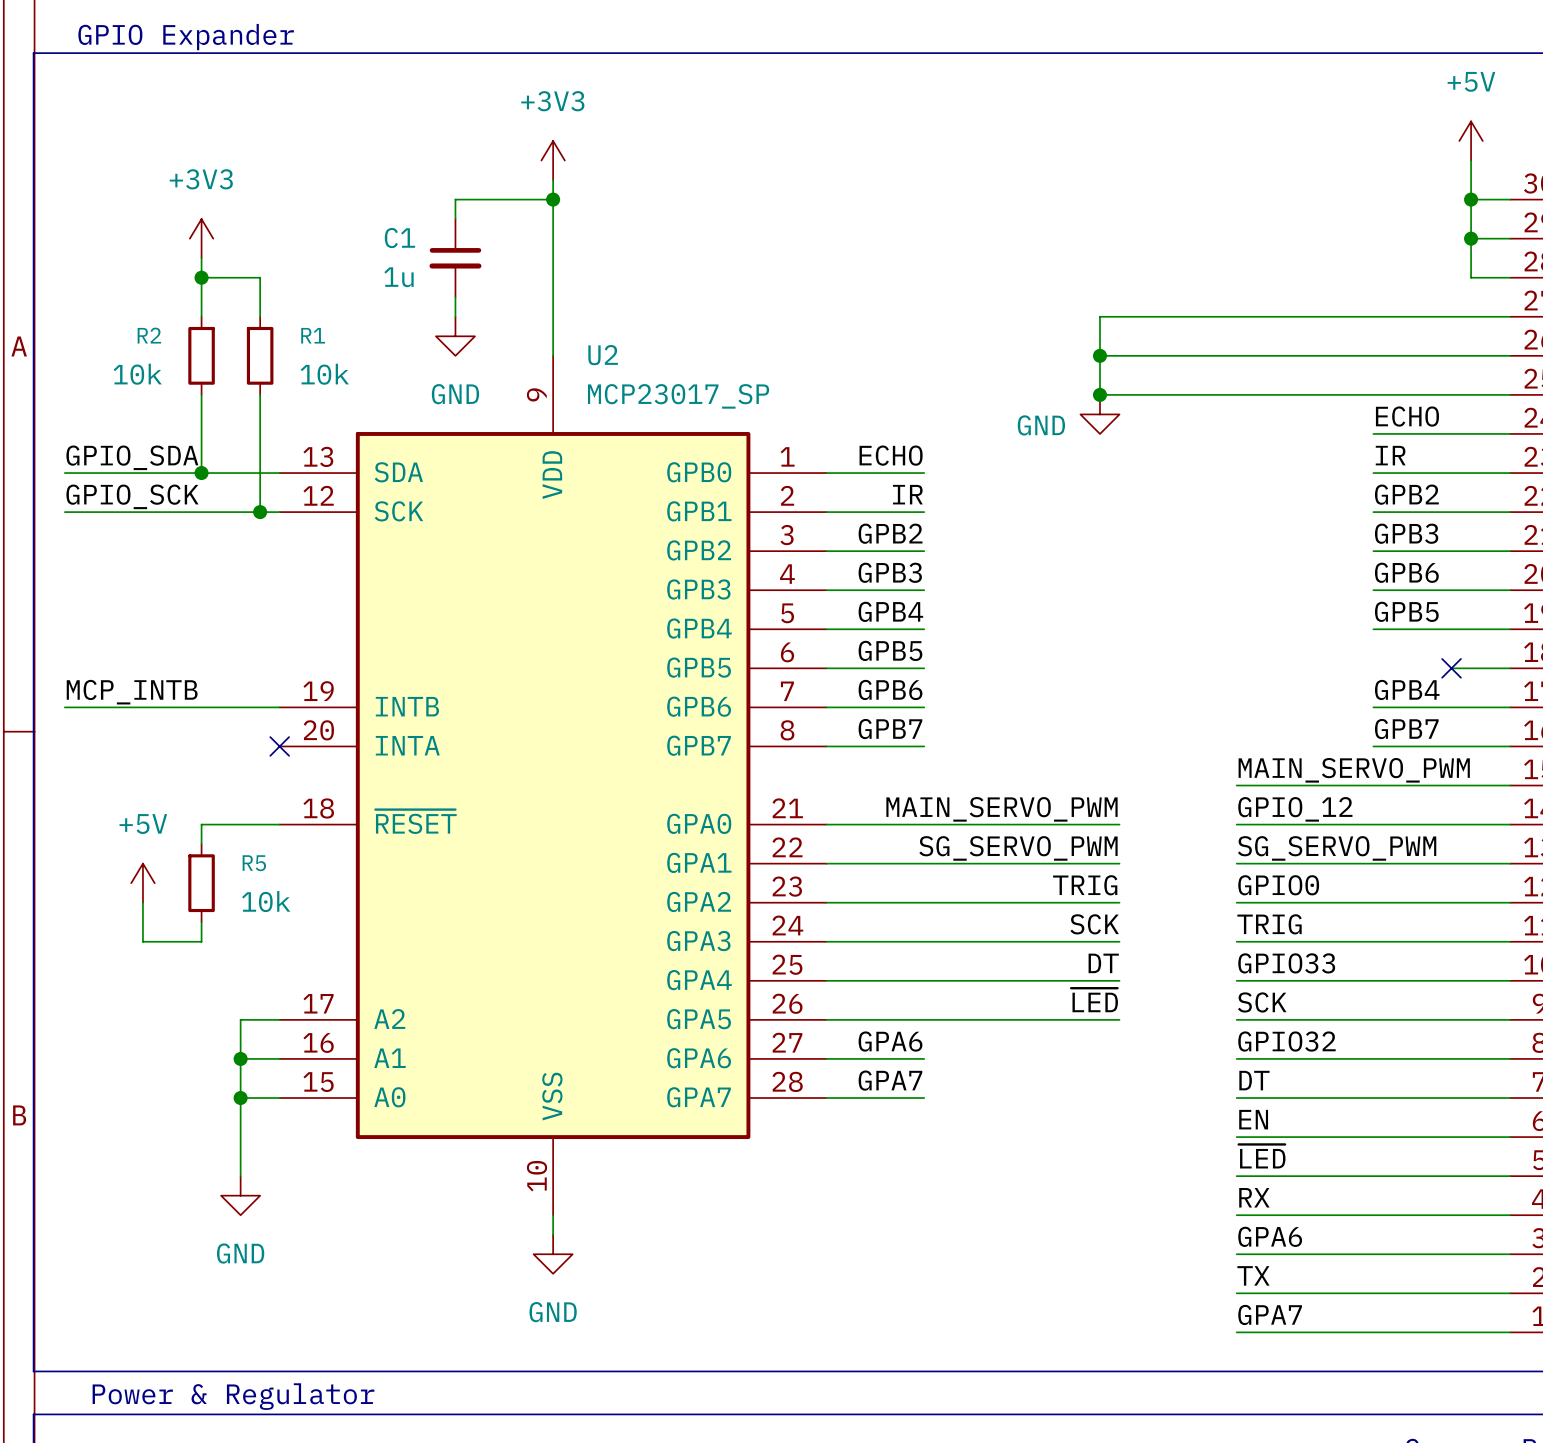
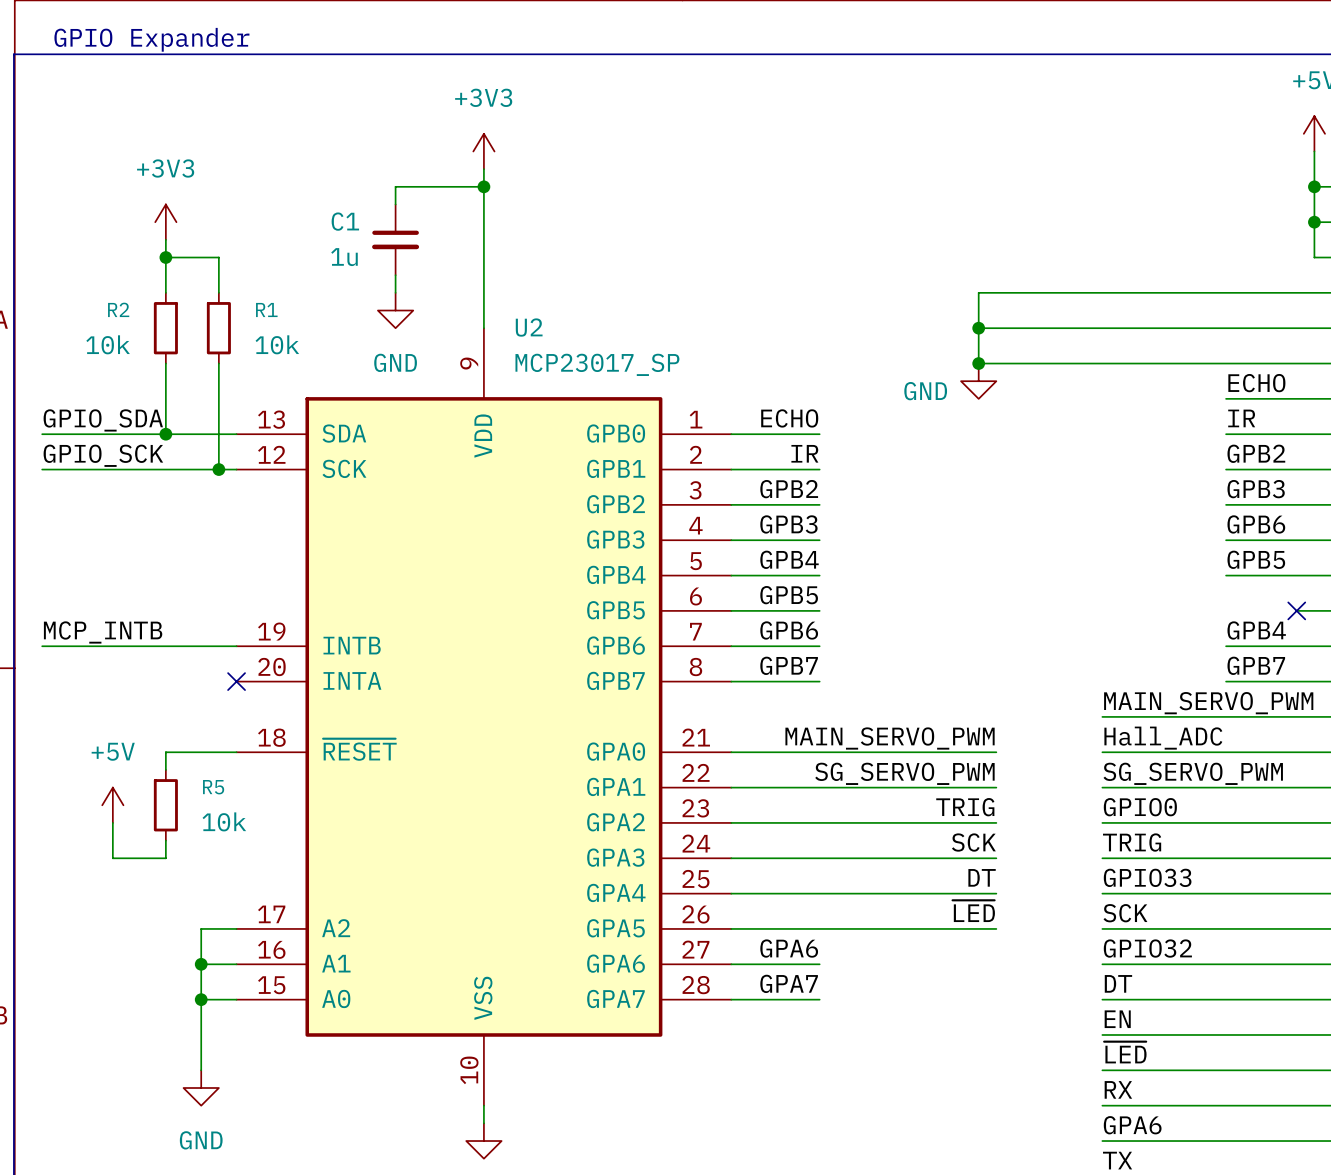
label: GPIO_12 (1295, 809) -> Hall_ADC (1163, 738)

